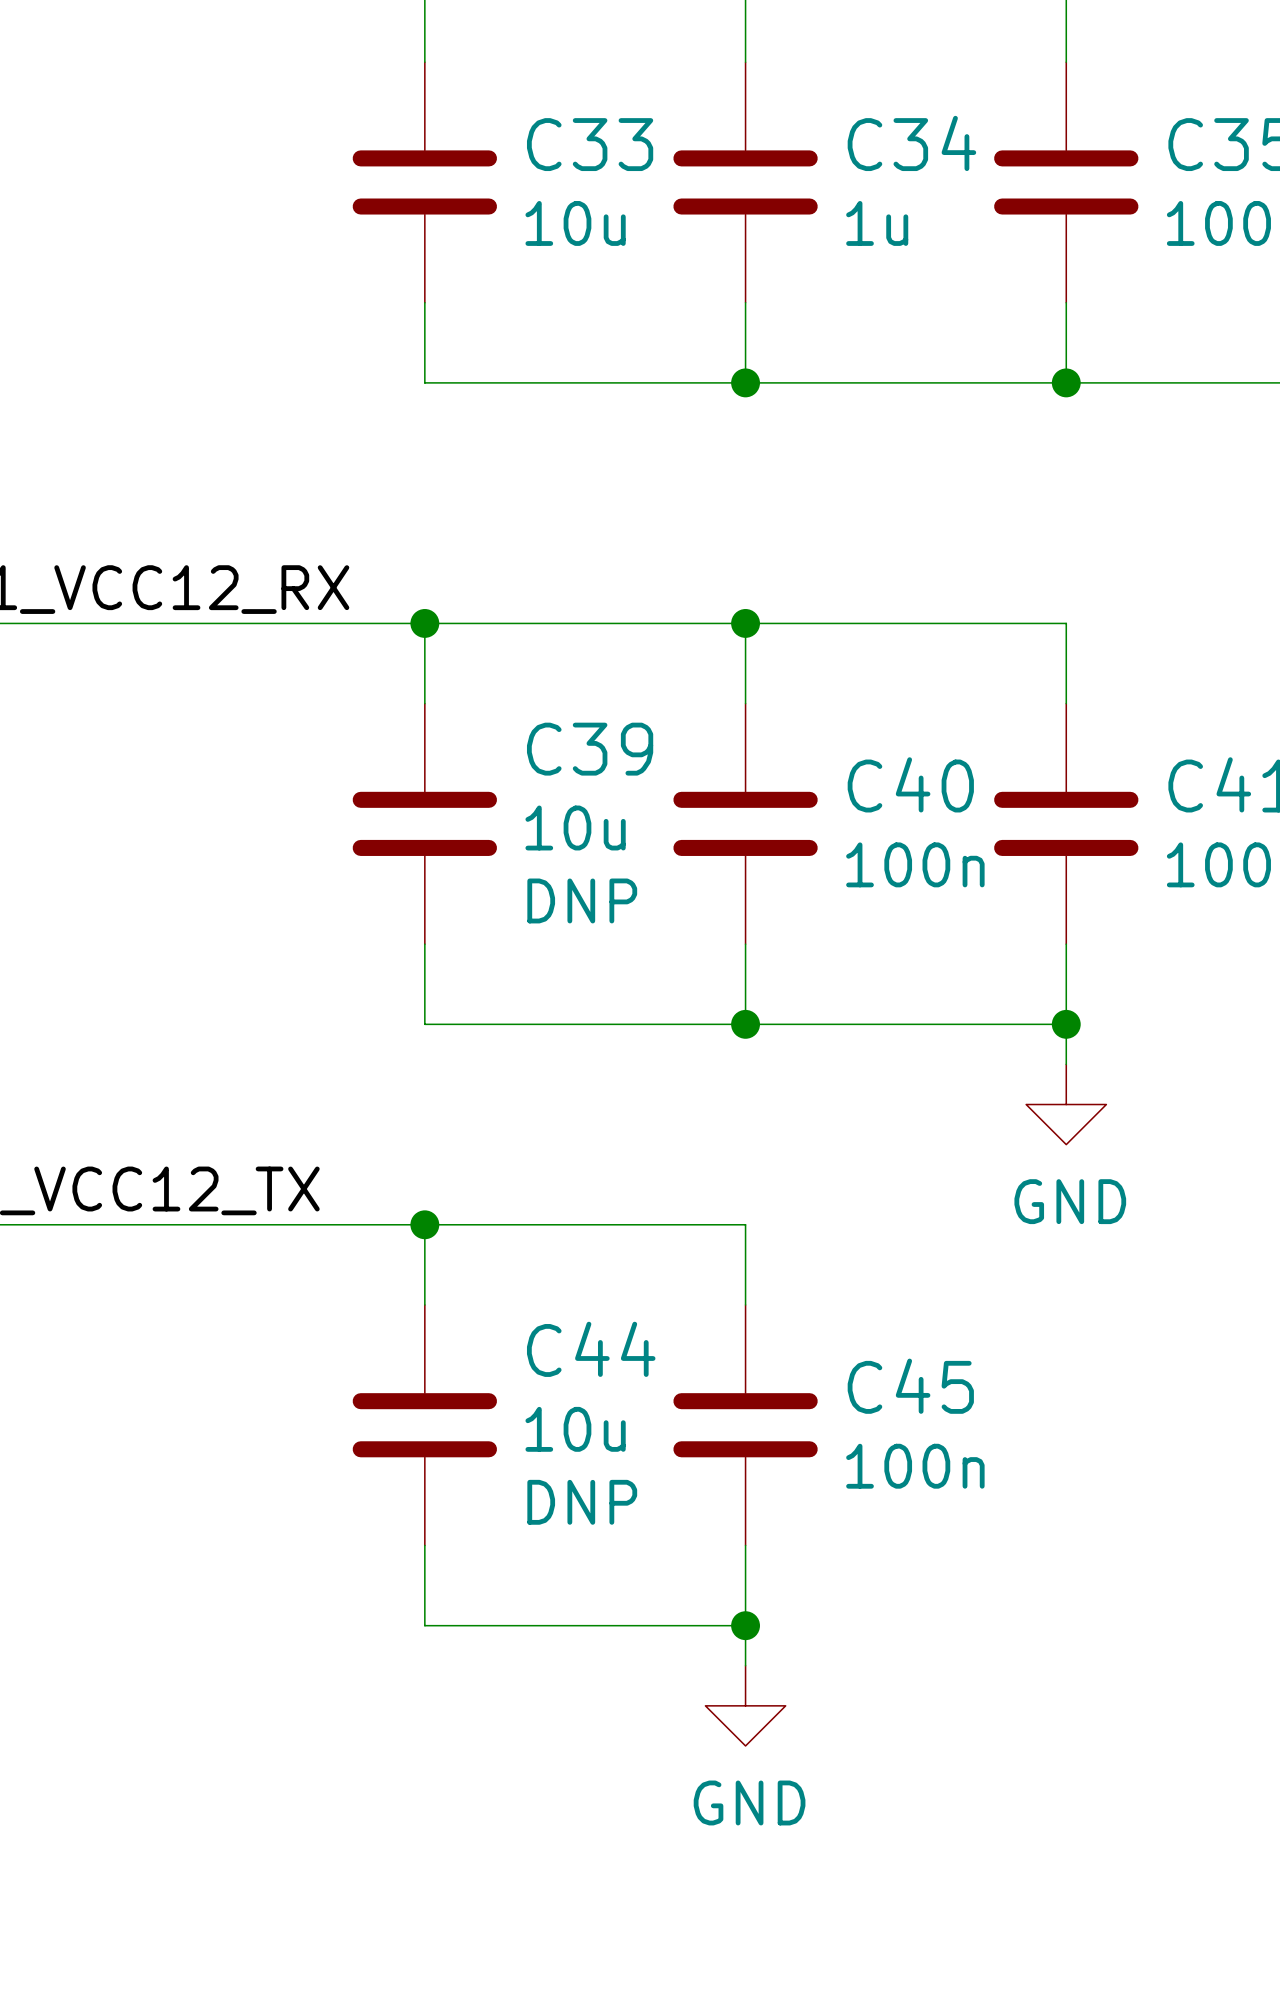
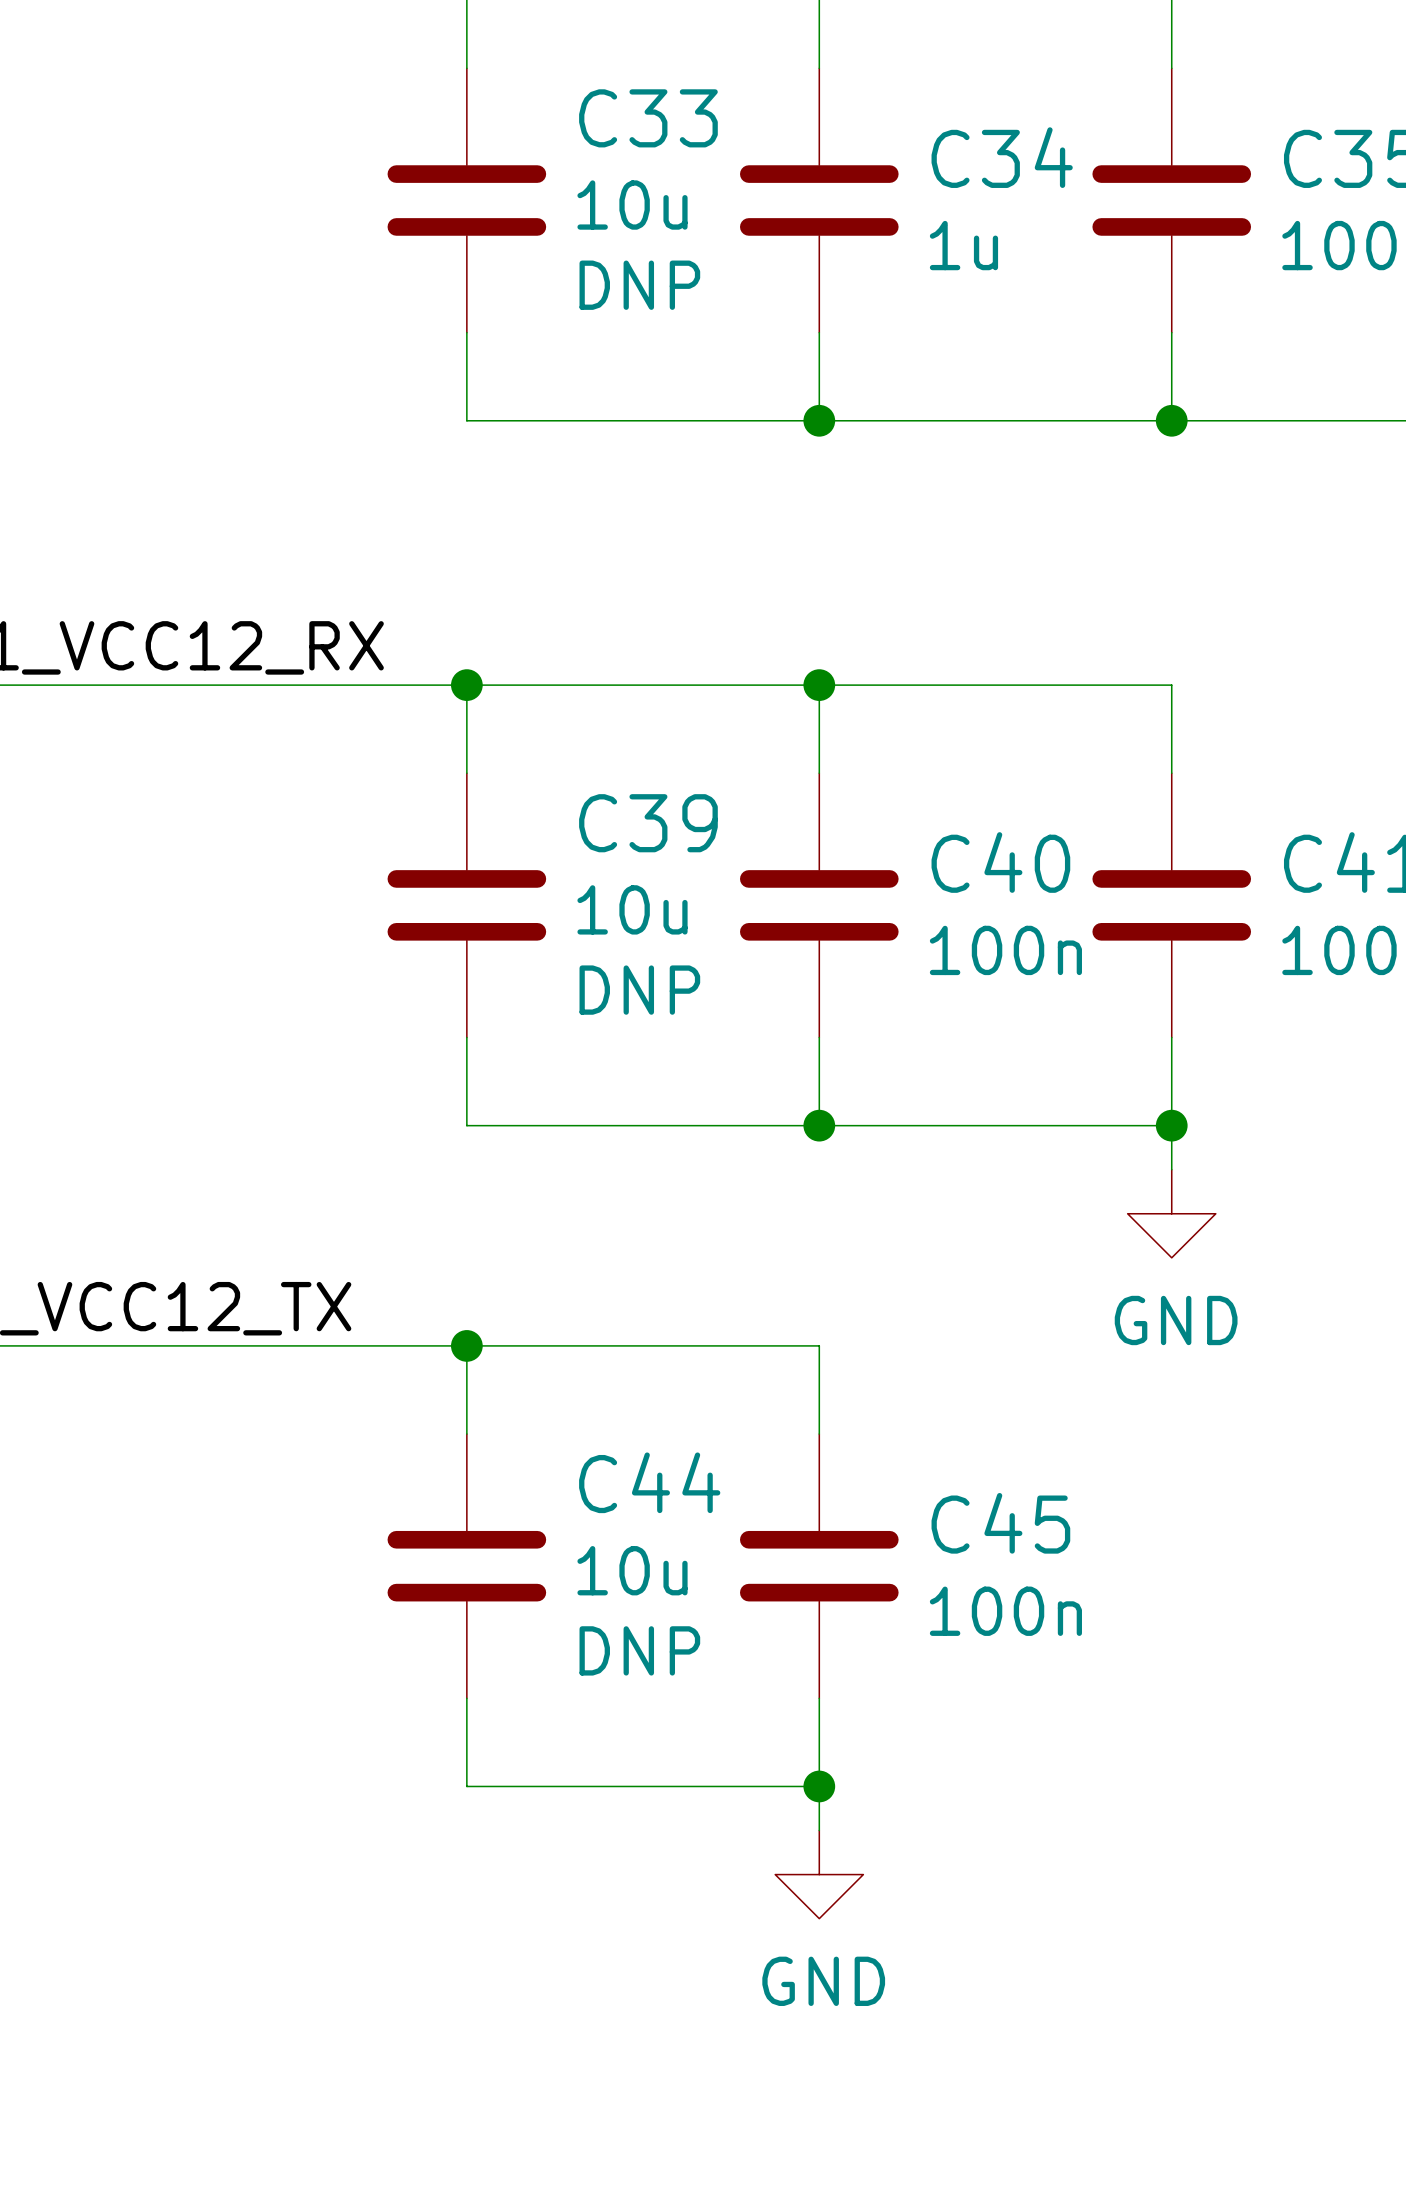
C33 name position: C33 (590, 144) -> C33 (648, 118)
C33 text position: 10u (575, 223) -> 10u (632, 205)
C33 text: none -> DNP (639, 285)

